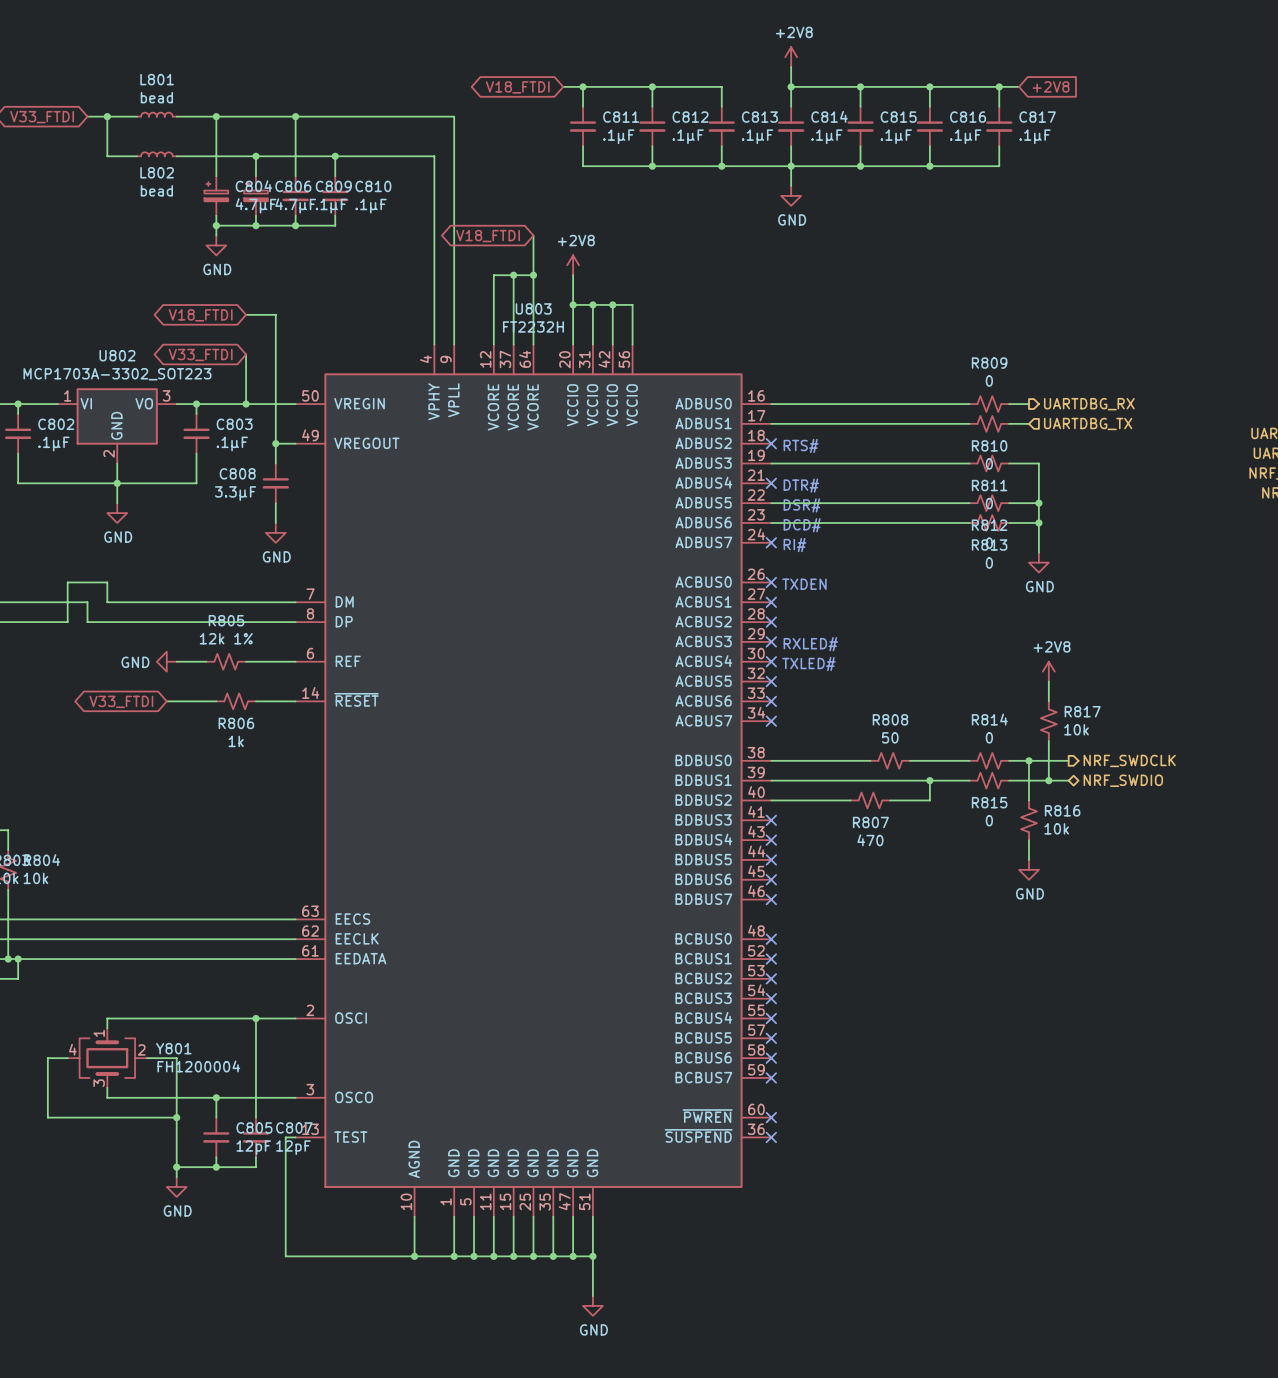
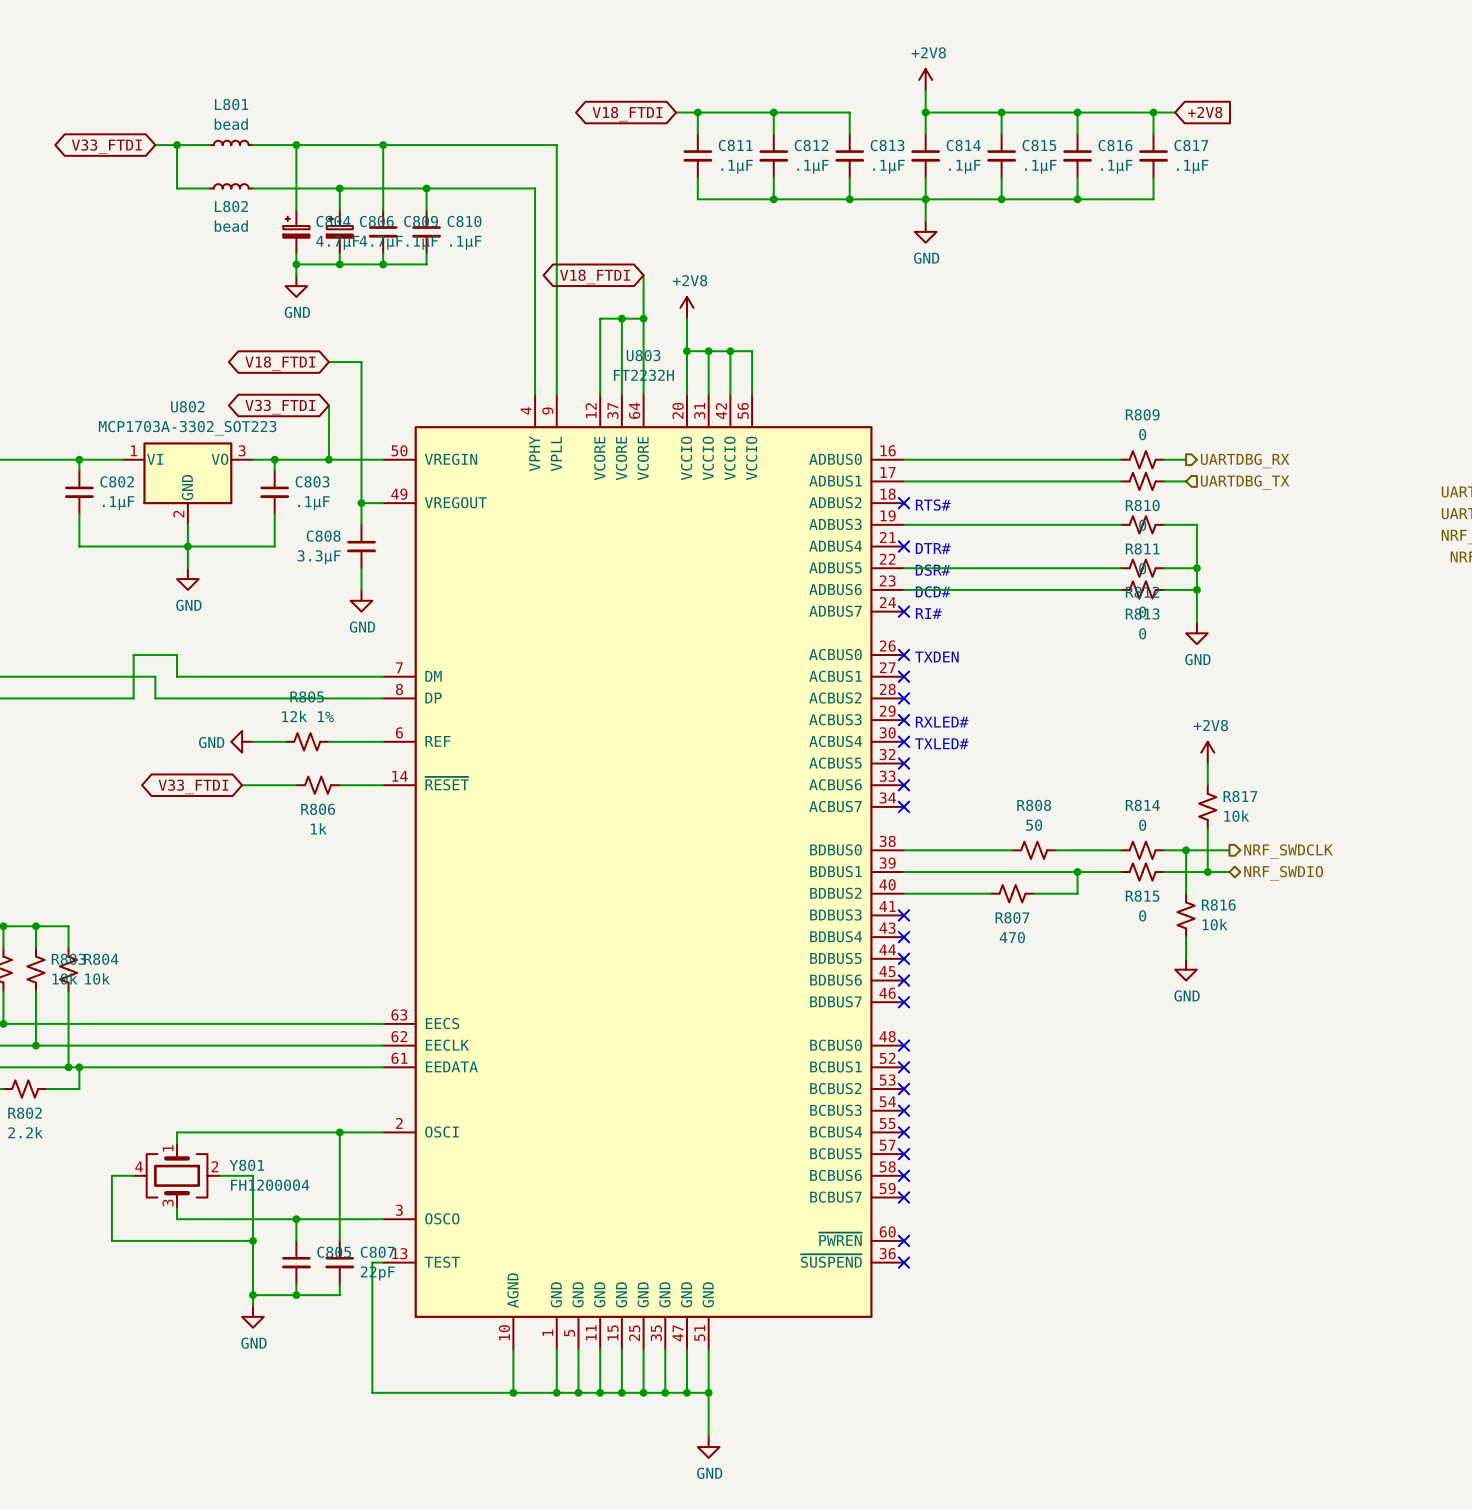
C805 value: 12pF (253, 1147) -> none
C807 value: 12pF (293, 1147) -> 22pF (377, 1273)

